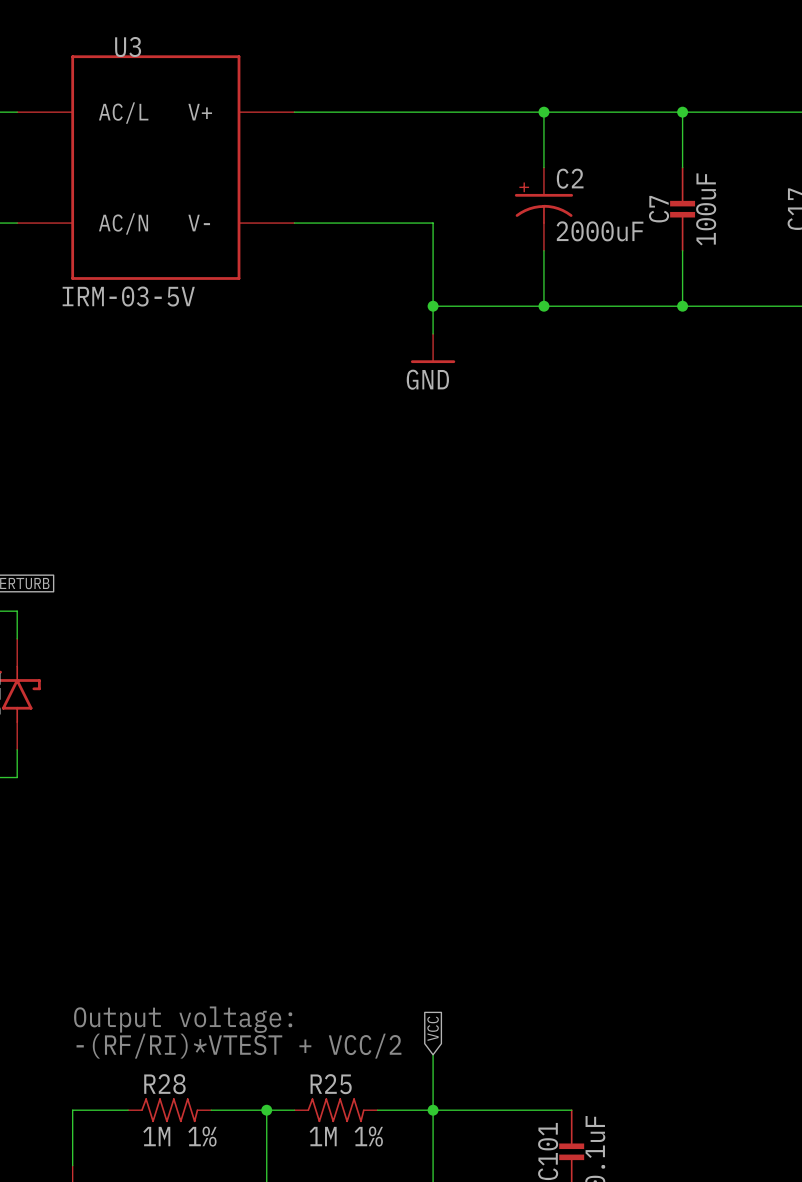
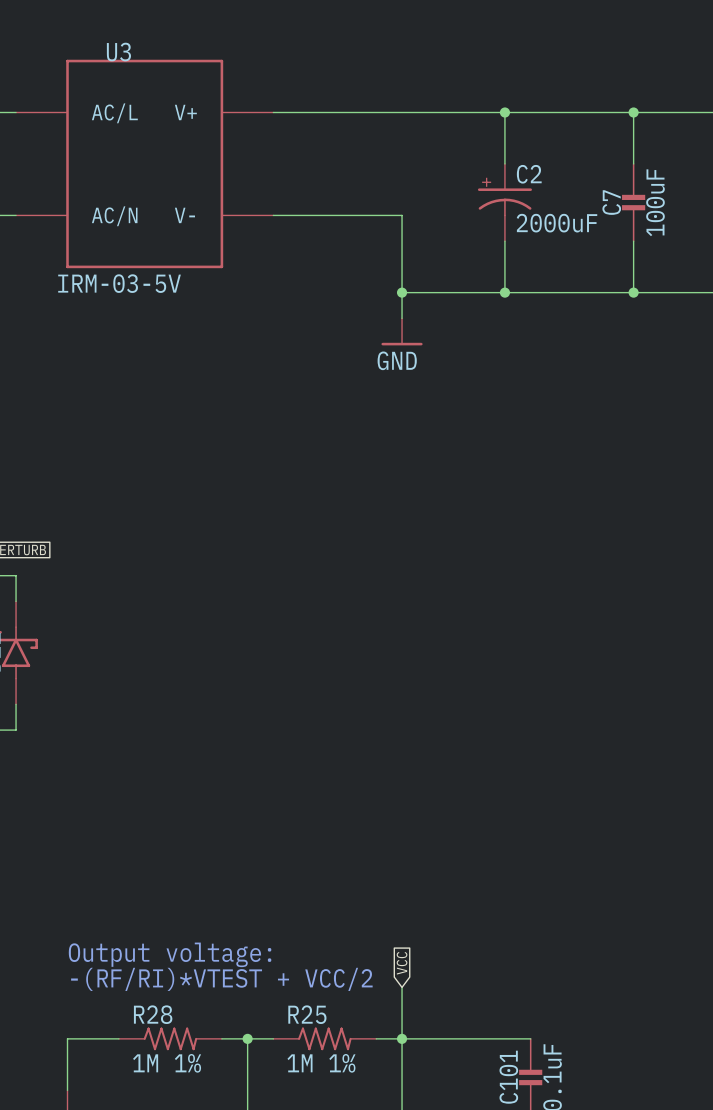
R28 symbol: [127, 1098, 212, 1123] -> [118, 1027, 222, 1051]
R25 symbol: [293, 1098, 379, 1123] -> [273, 1027, 377, 1051]

